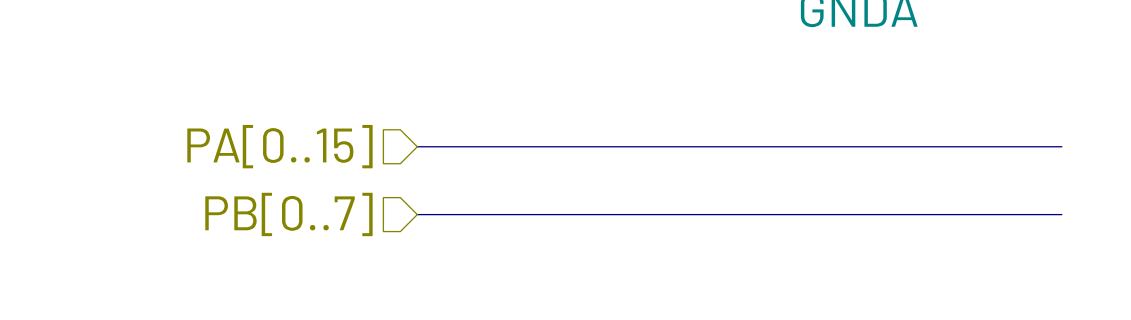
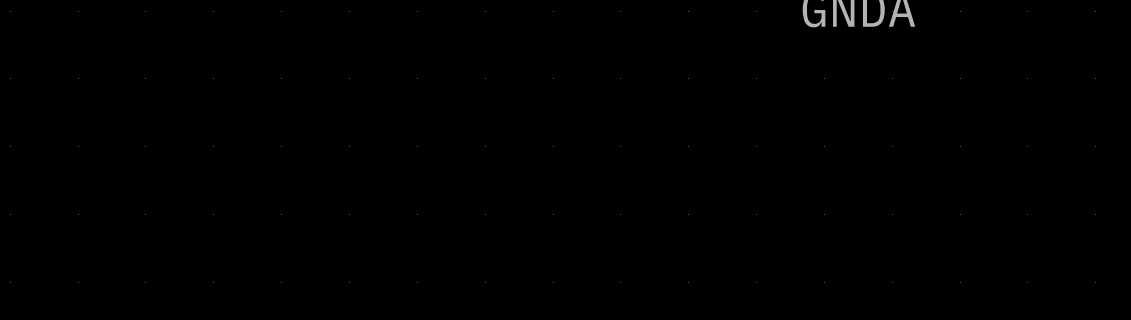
hierarchical label: PA[0..15] (279, 146) -> none
bus: (417, 146) (1061, 146) -> none
hierarchical label: PB[0..7] (288, 214) -> none
bus: (417, 214) (1061, 214) -> none

